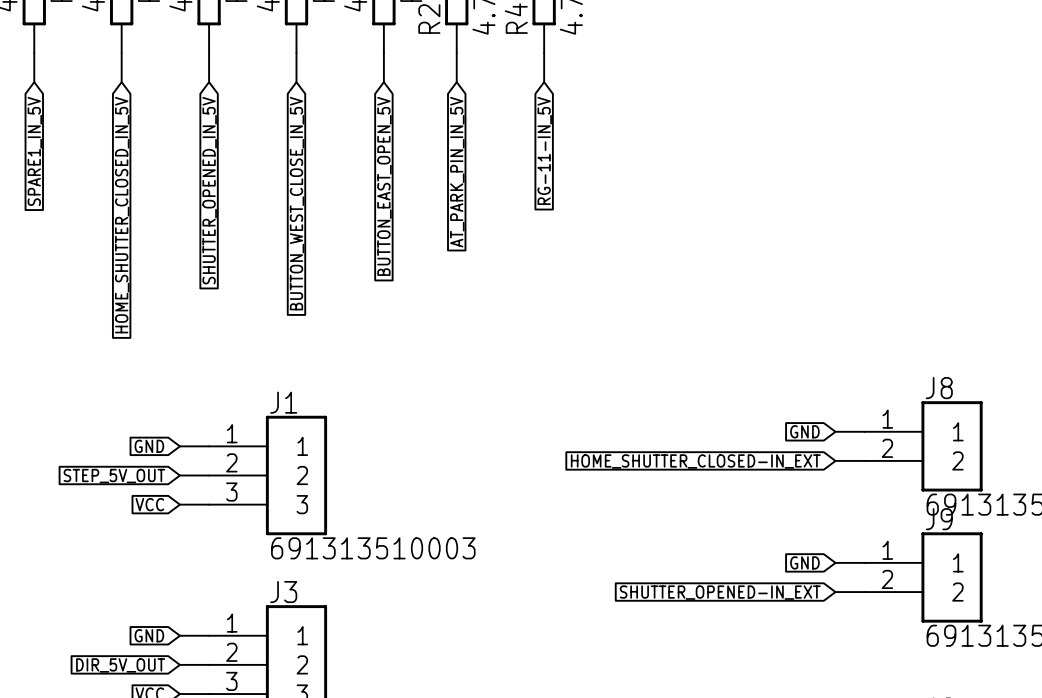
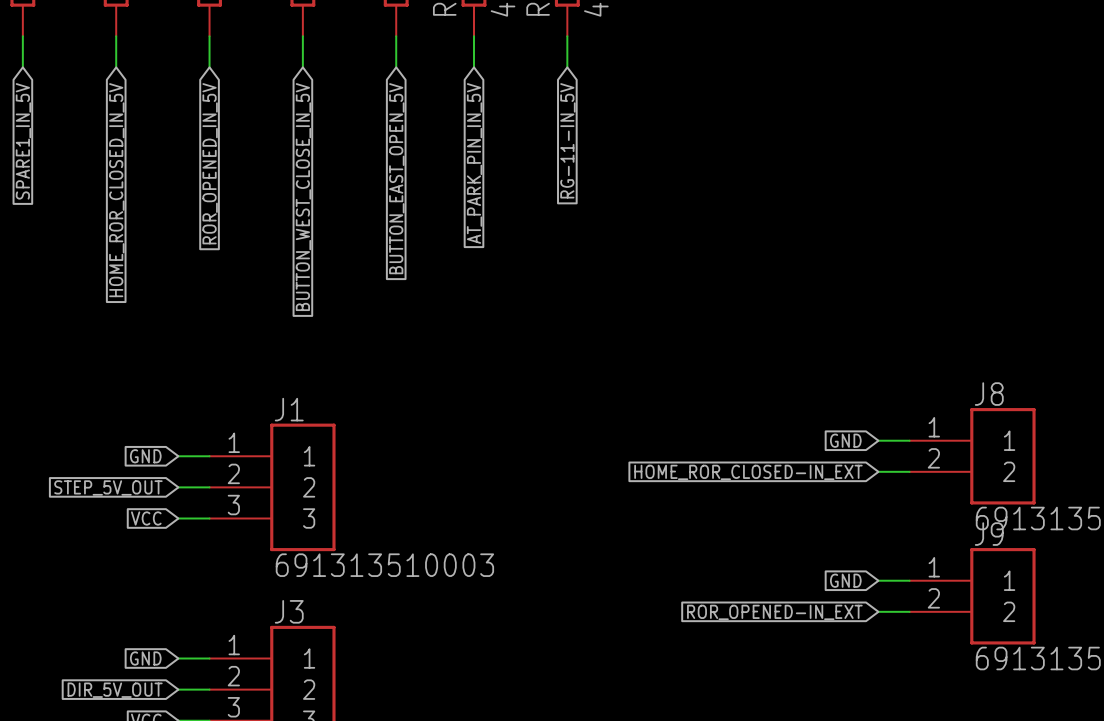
global label: SHUTTER_OPENED_IN_5V (209, 190) -> ROR_OPENED_IN_5V (210, 163)
global label: HOME_SHUTTER_CLOSED_IN_5V (122, 215) -> HOME_ROR_CLOSED_IN_5V (116, 190)
global label: HOME_SHUTTER_CLOSED-IN_EXT (695, 461) -> HOME_ROR_CLOSED-IN_EXT (748, 472)
global label: SHUTTER_OPENED-IN_EXT (720, 592) -> ROR_OPENED-IN_EXT (774, 612)

